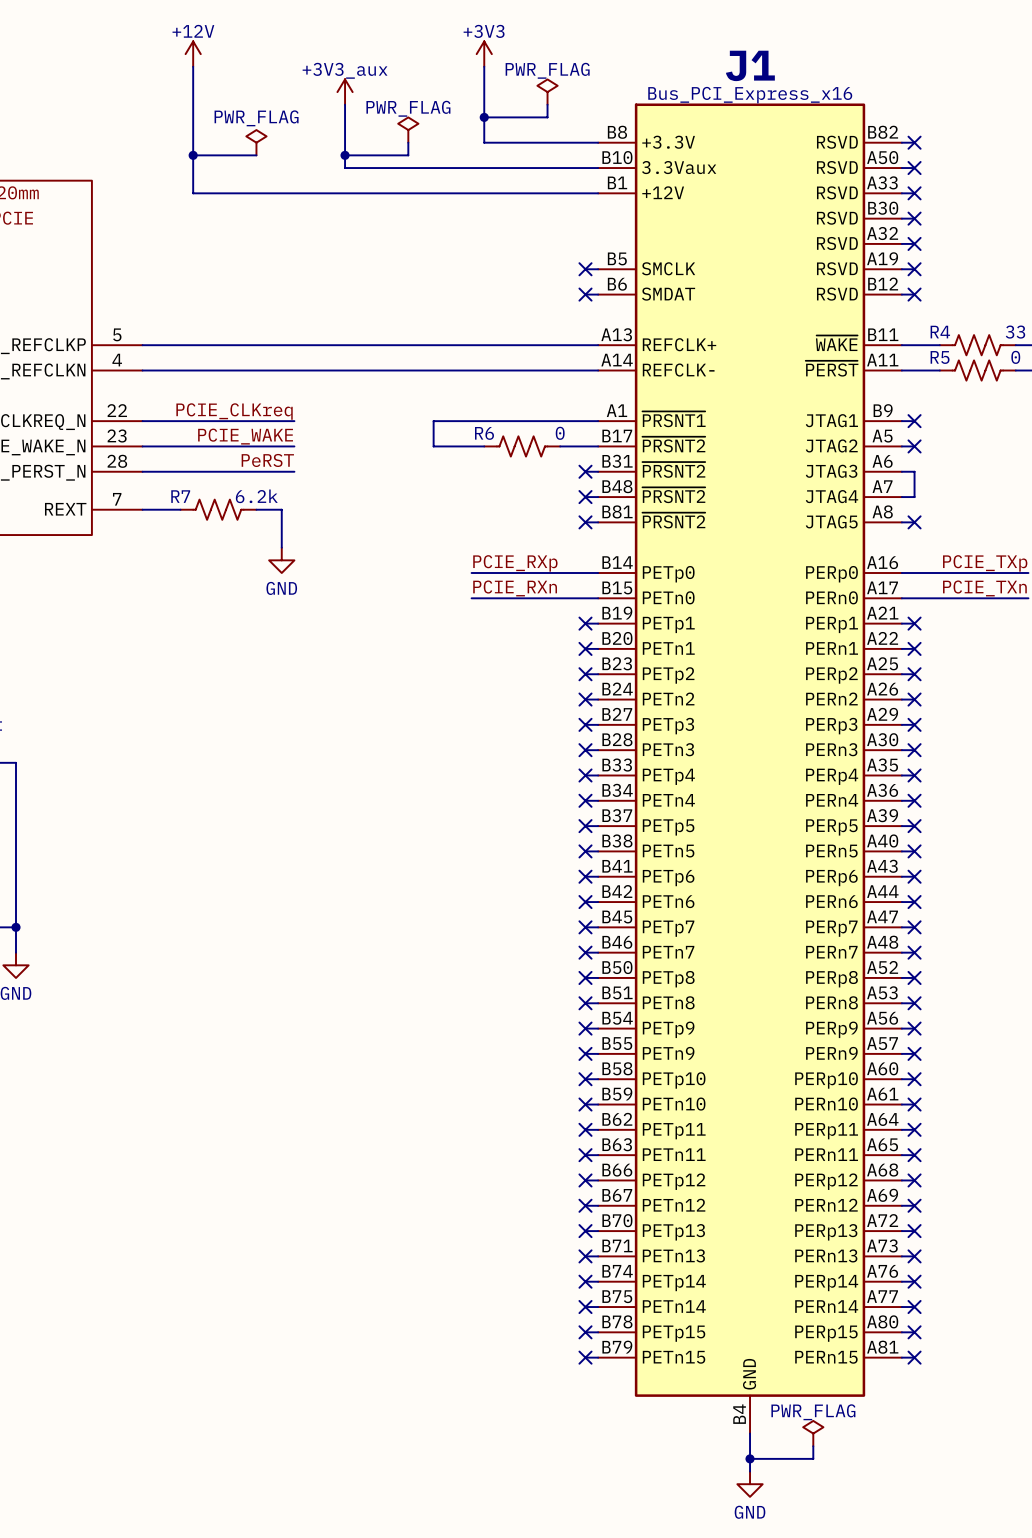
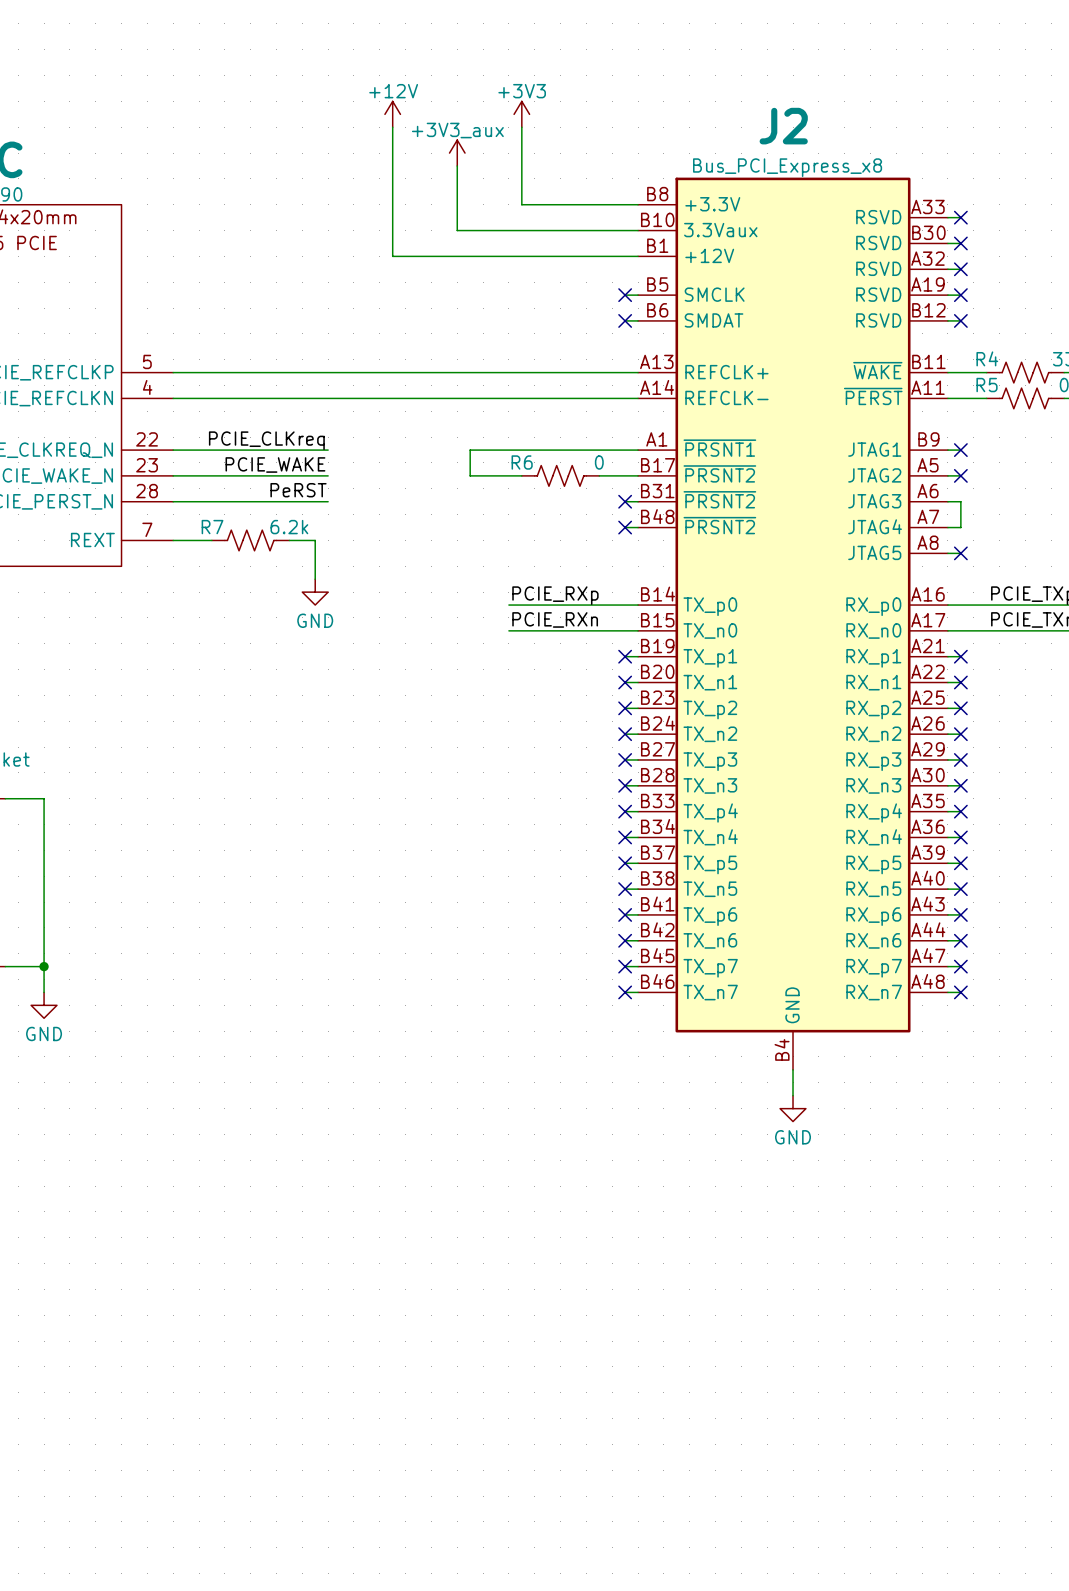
power symbol position: +12V (193, 54) -> +12V (392, 114)
power symbol position: +3V3 (484, 54) -> +3V3 (521, 114)
wire: (193, 66) (193, 193) (598, 193) -> none
power symbol position: +3V3_aux (345, 92) -> +3V3_aux (457, 153)
power symbol: PWR_FLAG (547, 92) -> none
wire: (345, 104) (345, 168) (598, 168) -> none
wire: none -> (392, 127) (392, 256) (638, 256)
wire: (547, 104) (547, 117) (484, 117) -> none
junction: (484, 117) -> none
power symbol: PWR_FLAG (408, 130) -> none
power symbol: PWR_FLAG (256, 142) -> none
wire: (408, 142) (408, 155) (345, 155) -> none
wire: none -> (457, 165) (457, 230) (638, 230)
wire: (484, 142) (598, 142) -> (521, 165) (521, 204) (638, 204)
wire: (901, 142) (914, 142) -> none
no-connect mark: (914, 142) -> none
wire: (193, 155) (256, 155) -> none
junction: (193, 155) -> none
junction: (345, 155) -> none
wire: (901, 168) (914, 168) -> none
no-connect mark: (914, 168) -> none
wire: (585, 522) (598, 522) -> none
no-connect mark: (585, 522) -> none
J2: none -> Bus_PCI_Express_x8 (793, 623)
J1: Bus_PCI_Express_x16 (750, 768) -> none
wire: (585, 977) (598, 977) -> none
no-connect mark: (585, 977) -> none
wire: (901, 977) (914, 977) -> none
no-connect mark: (914, 977) -> none
wire: (585, 1003) (598, 1003) -> none
no-connect mark: (585, 1003) -> none
wire: (901, 1003) (914, 1003) -> none
no-connect mark: (914, 1003) -> none
wire: (585, 1028) (598, 1028) -> none
no-connect mark: (585, 1028) -> none
wire: (901, 1028) (914, 1028) -> none
no-connect mark: (914, 1028) -> none
wire: (585, 1053) (598, 1053) -> none
no-connect mark: (585, 1053) -> none
wire: (901, 1053) (914, 1053) -> none
no-connect mark: (914, 1053) -> none
power symbol: none -> GND (793, 1108)
wire: (585, 1079) (598, 1079) -> none
no-connect mark: (585, 1079) -> none
wire: (901, 1079) (914, 1079) -> none
no-connect mark: (914, 1079) -> none
wire: (585, 1104) (598, 1104) -> none
no-connect mark: (585, 1104) -> none
wire: (901, 1104) (914, 1104) -> none
no-connect mark: (914, 1104) -> none
wire: (585, 1129) (598, 1129) -> none
no-connect mark: (585, 1129) -> none
wire: (901, 1129) (914, 1129) -> none
no-connect mark: (914, 1129) -> none
wire: (585, 1155) (598, 1155) -> none
no-connect mark: (585, 1155) -> none
wire: (901, 1155) (914, 1155) -> none
no-connect mark: (914, 1155) -> none
wire: (585, 1180) (598, 1180) -> none
no-connect mark: (585, 1180) -> none
wire: (901, 1180) (914, 1180) -> none
no-connect mark: (914, 1180) -> none
wire: (585, 1205) (598, 1205) -> none
no-connect mark: (585, 1205) -> none
wire: (901, 1205) (914, 1205) -> none
no-connect mark: (914, 1205) -> none
wire: (585, 1231) (598, 1231) -> none
no-connect mark: (585, 1231) -> none
wire: (901, 1231) (914, 1231) -> none
no-connect mark: (914, 1231) -> none
wire: (585, 1256) (598, 1256) -> none
no-connect mark: (585, 1256) -> none
wire: (901, 1256) (914, 1256) -> none
no-connect mark: (914, 1256) -> none
wire: (585, 1281) (598, 1281) -> none
no-connect mark: (585, 1281) -> none
wire: (901, 1281) (914, 1281) -> none
no-connect mark: (914, 1281) -> none
wire: (585, 1307) (598, 1307) -> none
no-connect mark: (585, 1307) -> none
wire: (901, 1307) (914, 1307) -> none
no-connect mark: (914, 1307) -> none
wire: (585, 1332) (598, 1332) -> none
no-connect mark: (585, 1332) -> none
wire: (901, 1332) (914, 1332) -> none
no-connect mark: (914, 1332) -> none
wire: (585, 1357) (598, 1357) -> none
no-connect mark: (585, 1357) -> none
wire: (901, 1357) (914, 1357) -> none
no-connect mark: (914, 1357) -> none
wire: (750, 1433) (750, 1471) -> none
power symbol: PWR_FLAG (813, 1433) -> none
wire: (813, 1446) (813, 1458) (750, 1458) -> none
junction: (750, 1458) -> none
power symbol: GND (750, 1484) -> none

